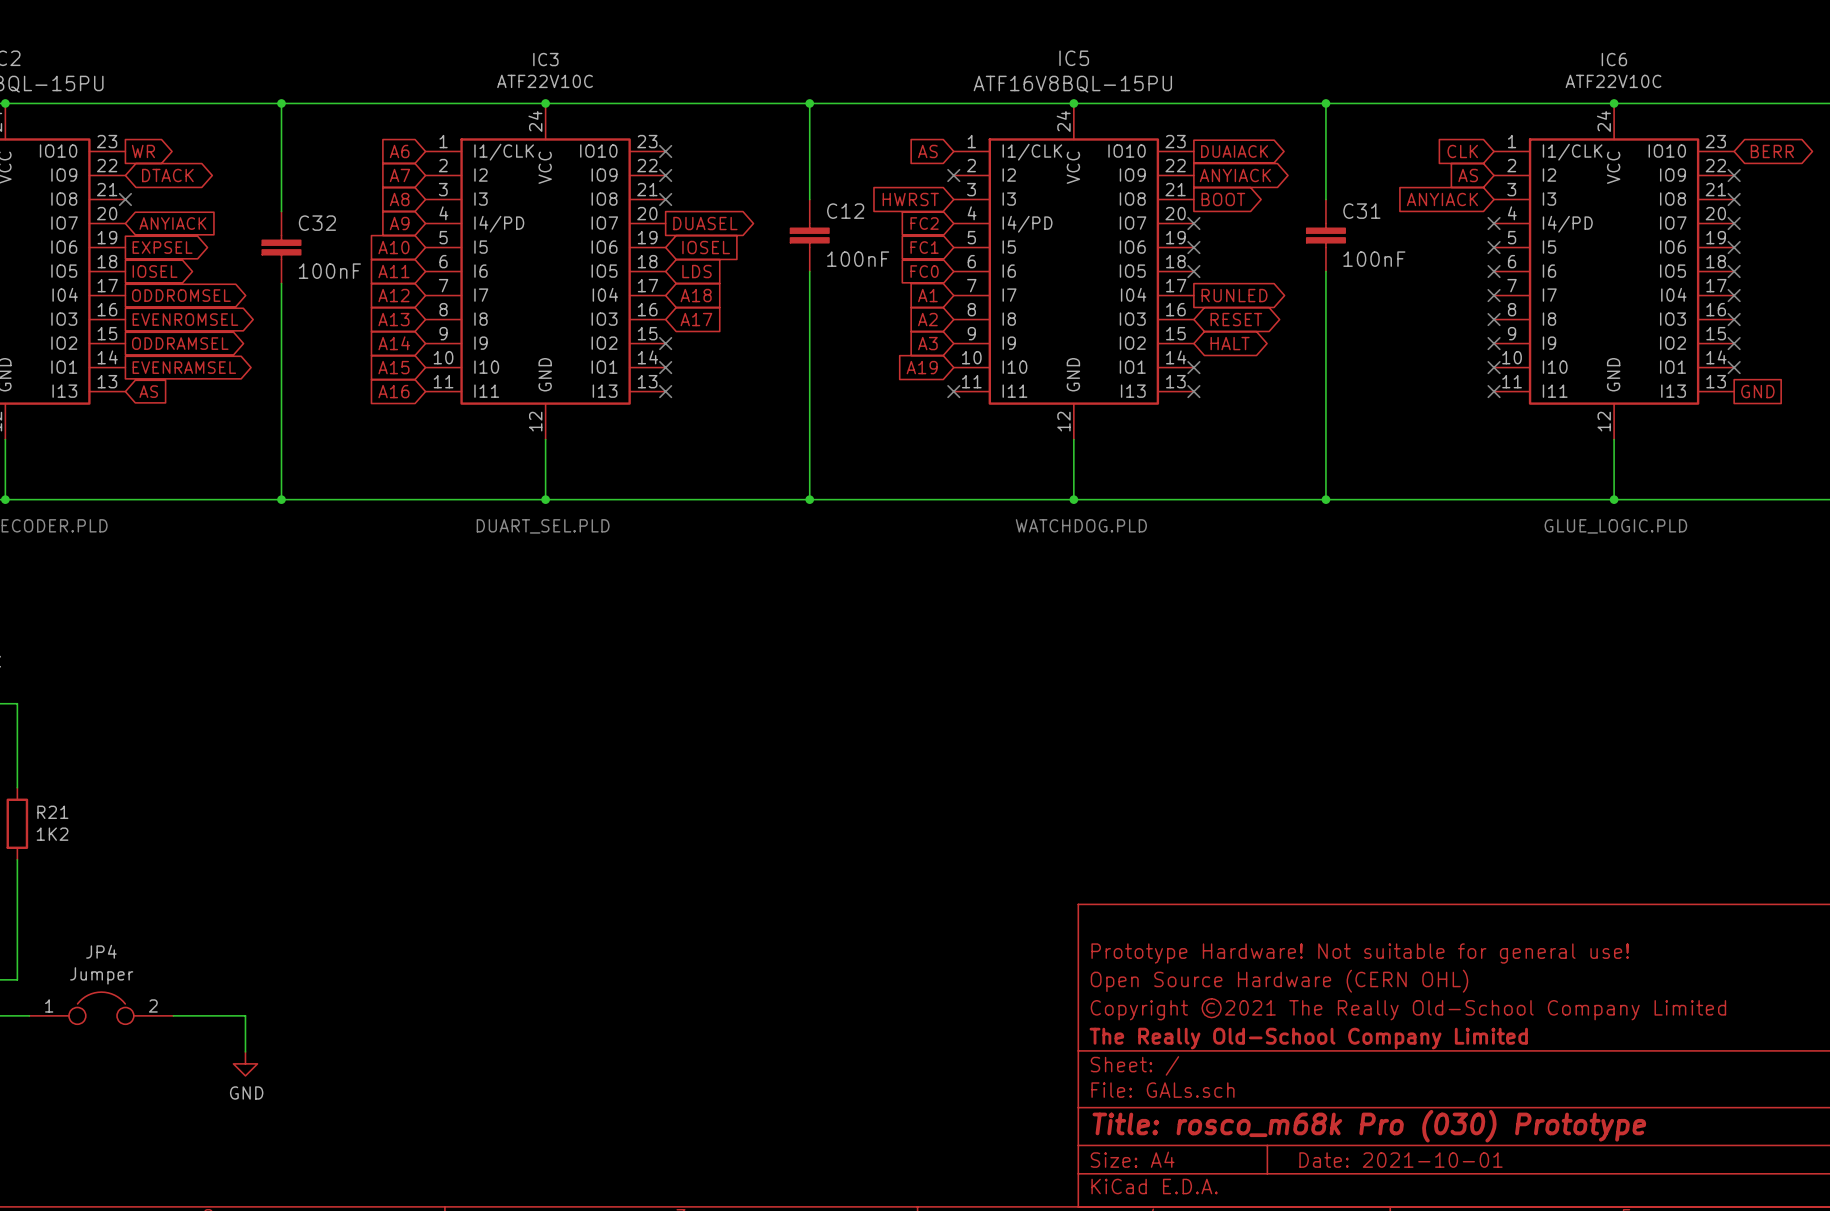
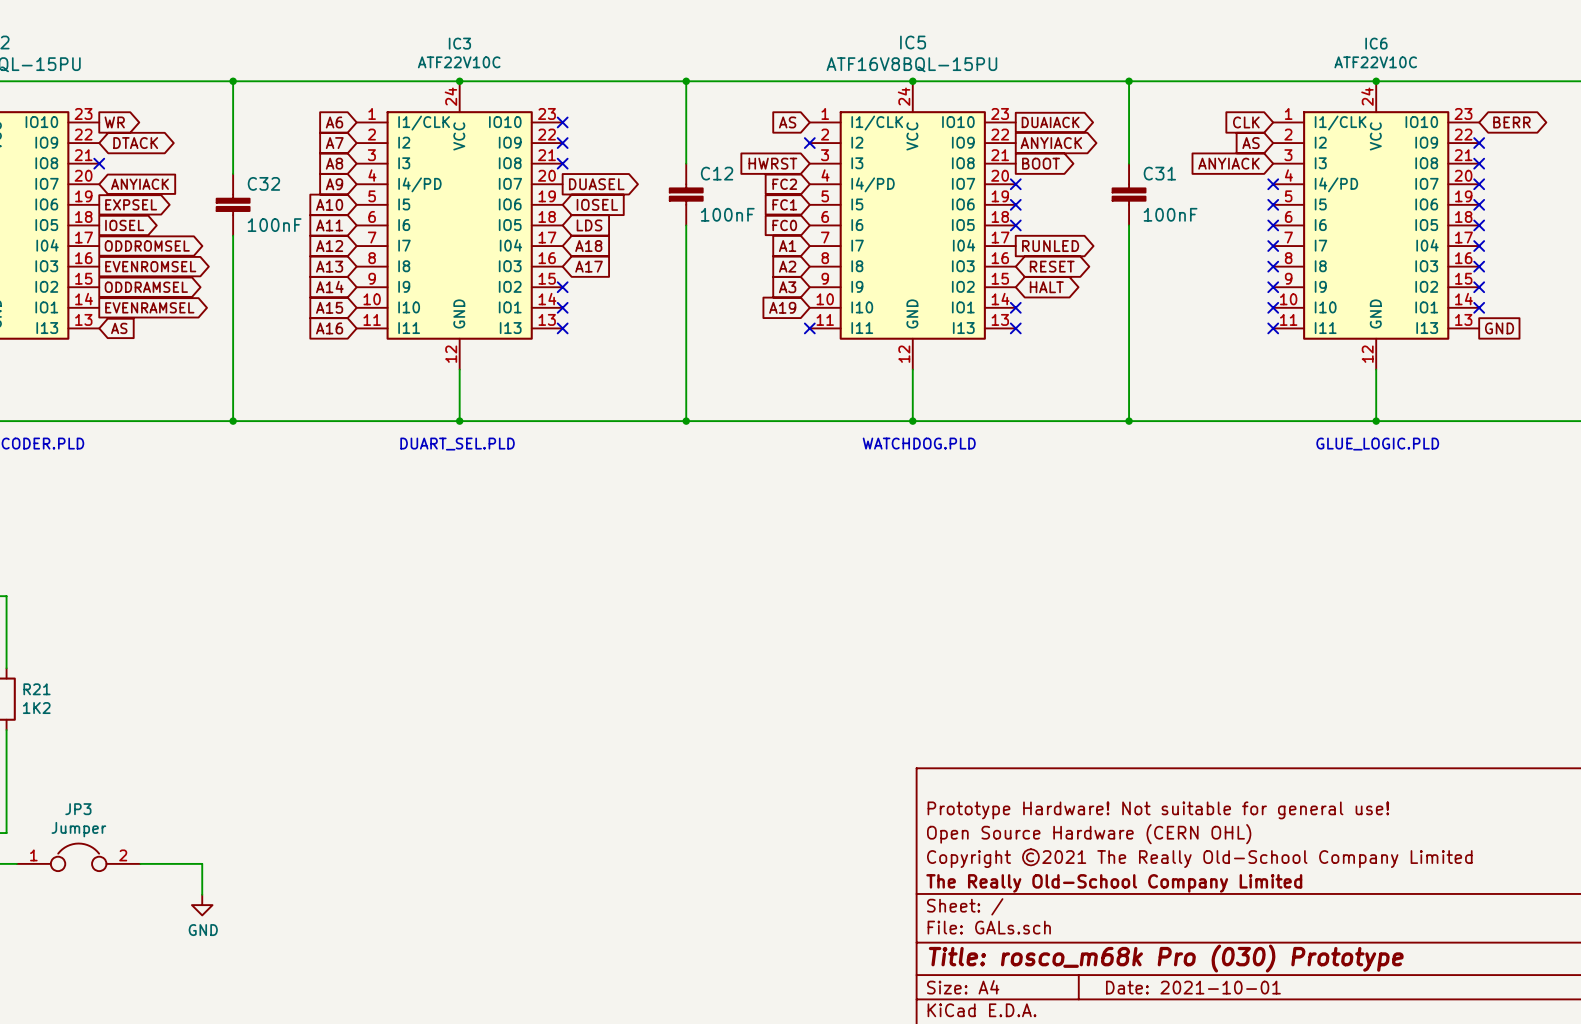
JP4 name: JP4 (101, 951) -> JP3 (78, 809)

